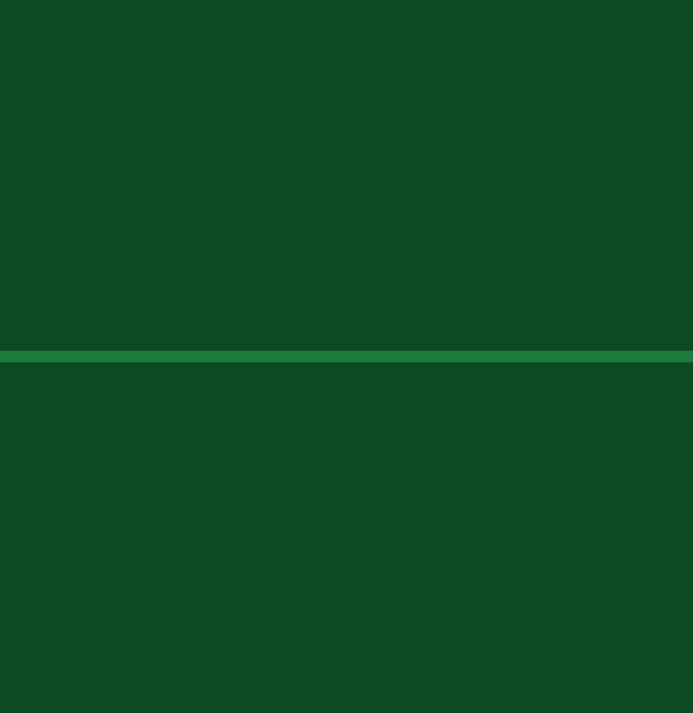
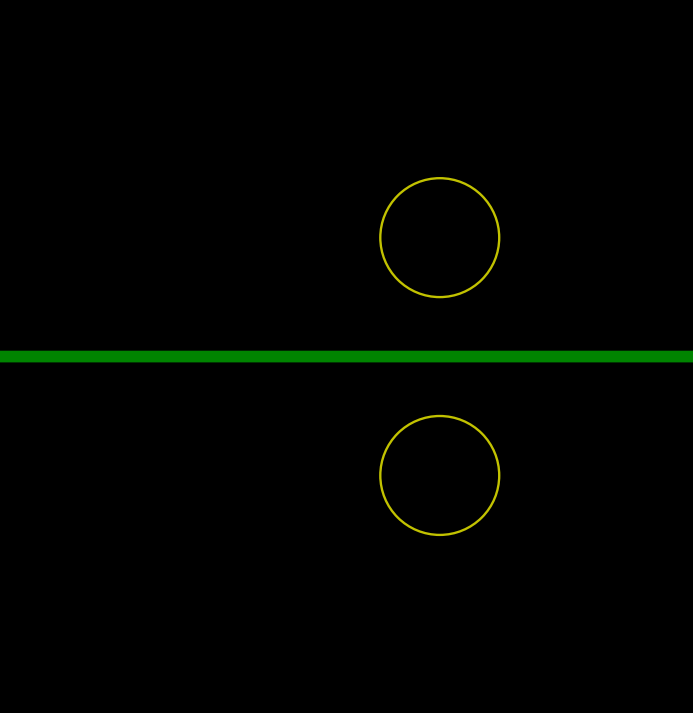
round board edge: none -> [379, 177, 501, 299]
round board edge: none -> [379, 414, 501, 537]

